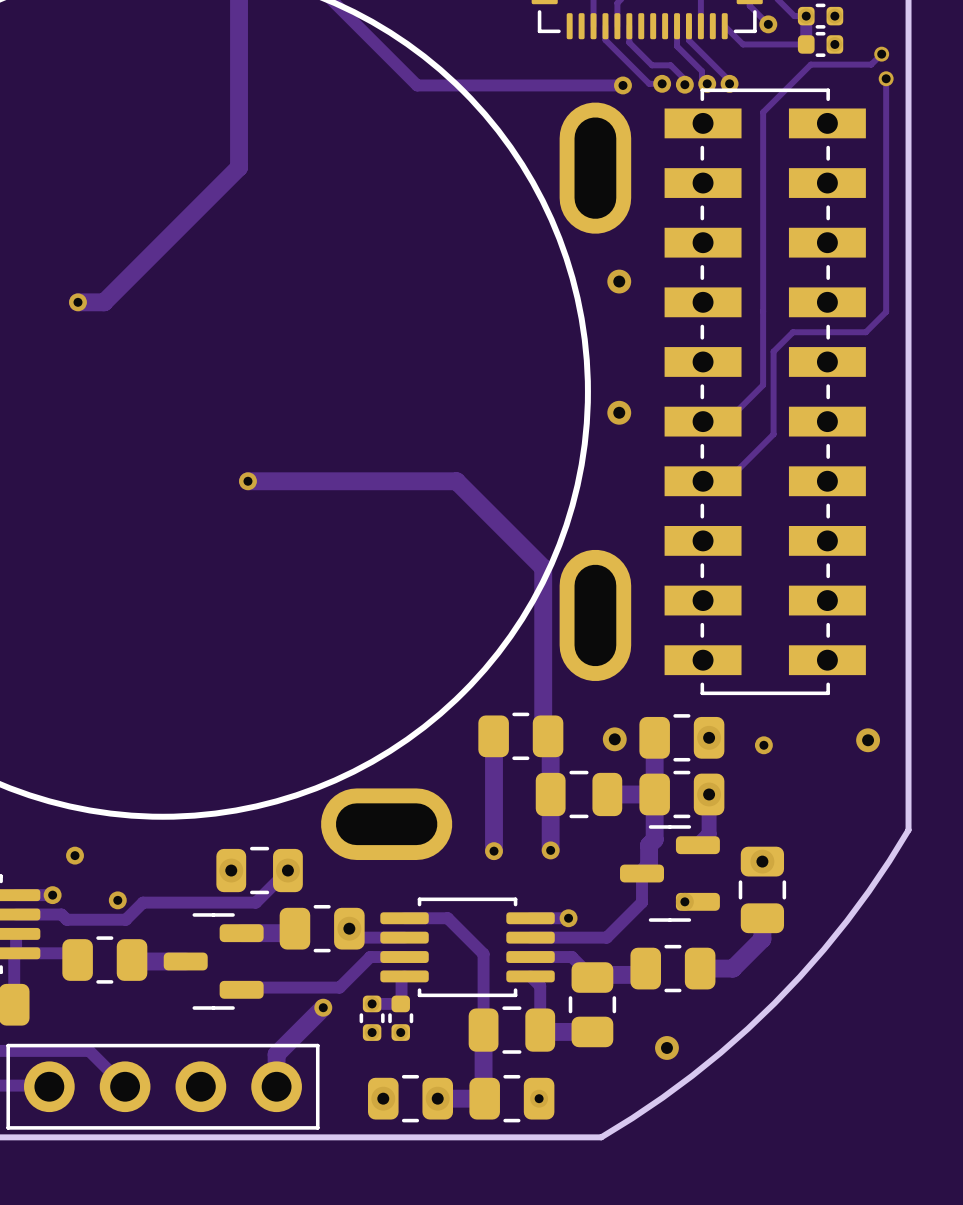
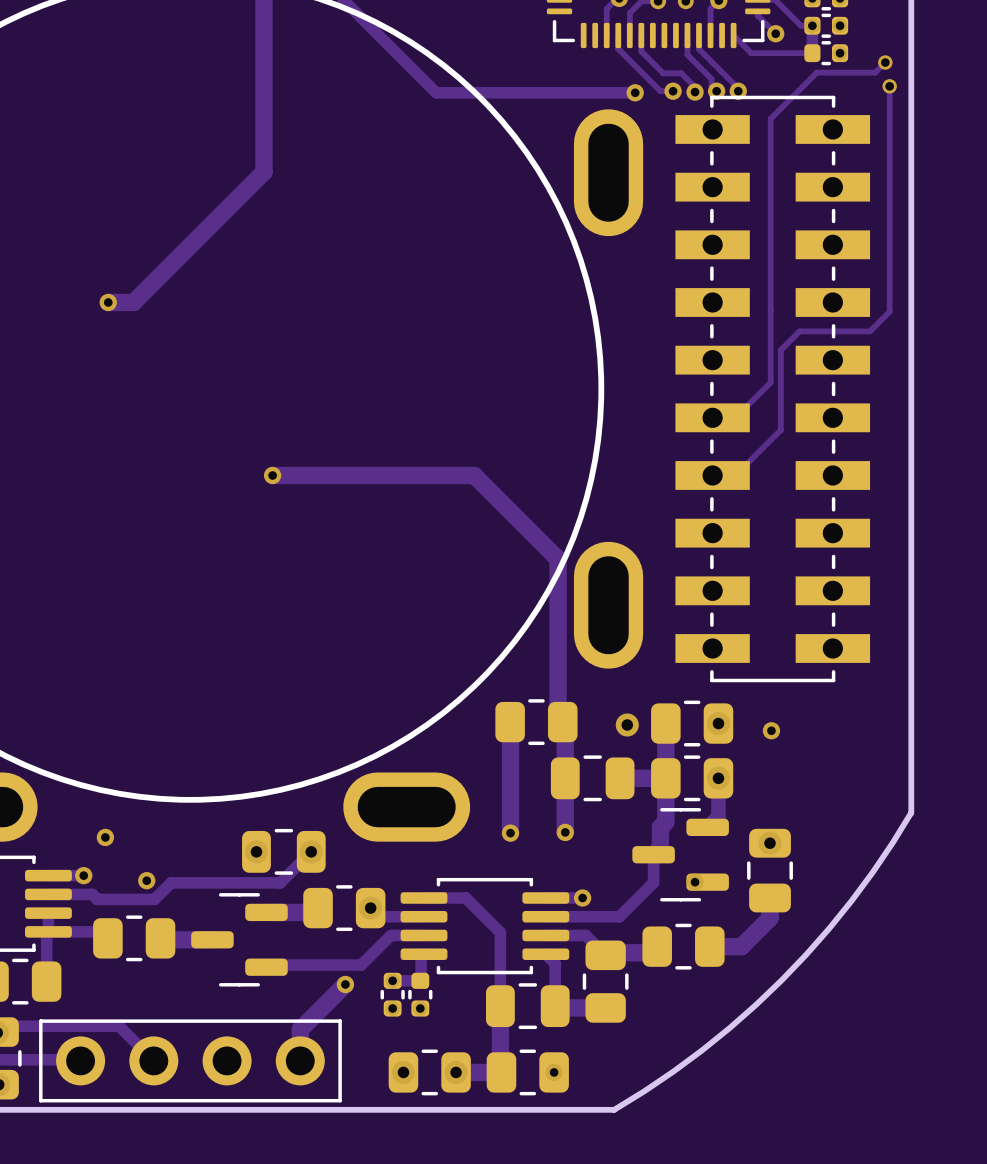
via: (619, 281) -> none
via: (619, 412) -> none
via: (868, 740) -> none
via: (666, 1047) -> none

